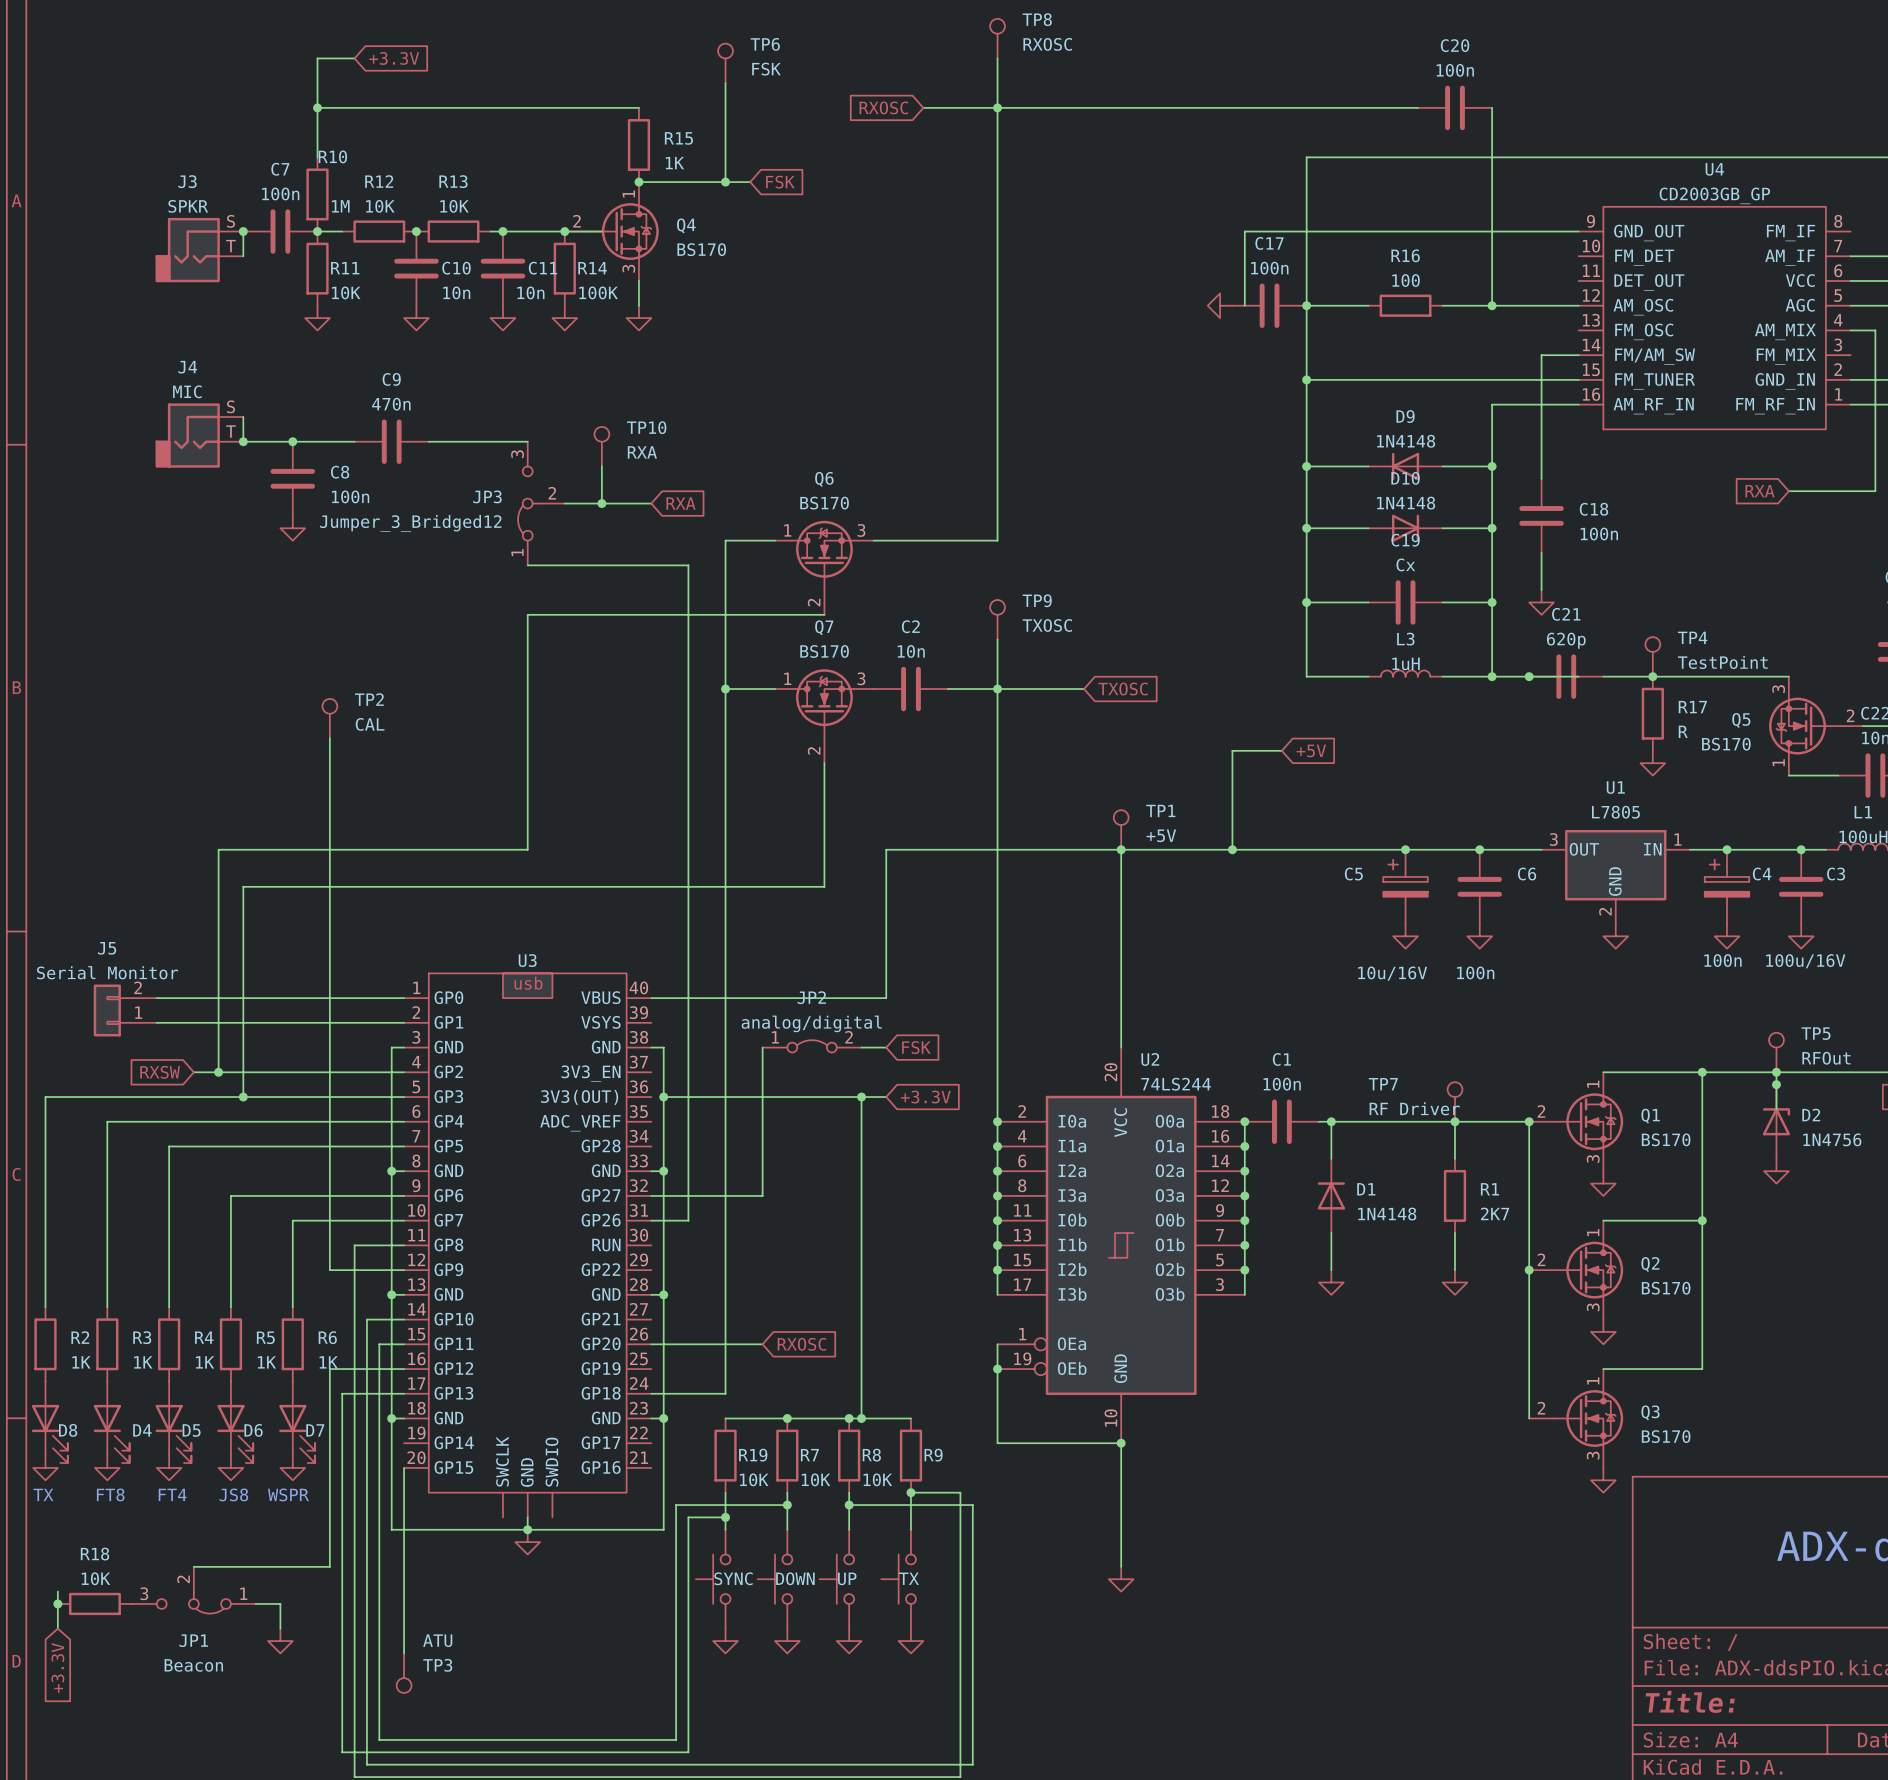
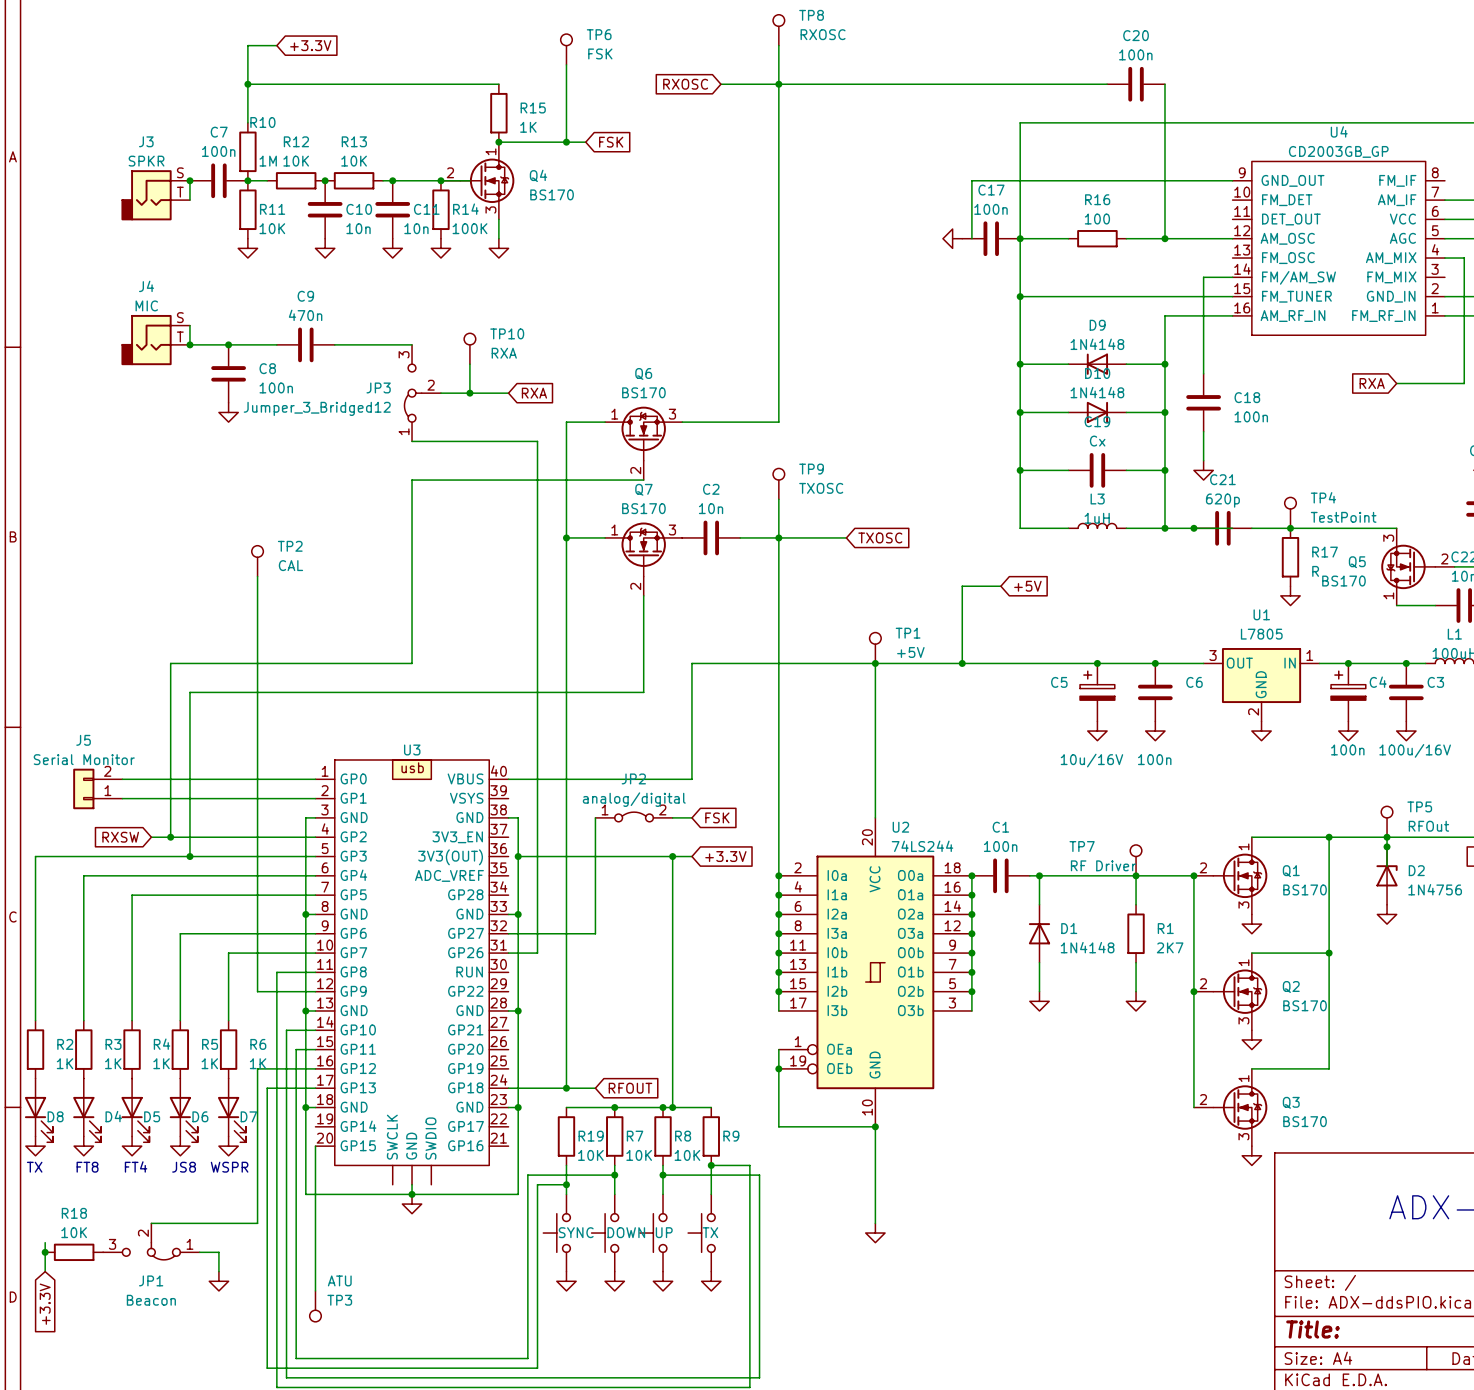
wire: (651, 1344) (762, 1344) -> none
global label: RXOSC (801, 1344) -> none
wire: none -> (566, 1088) (595, 1088)
junction: none -> (566, 1088)
global label: none -> RFOUT (630, 1088)

